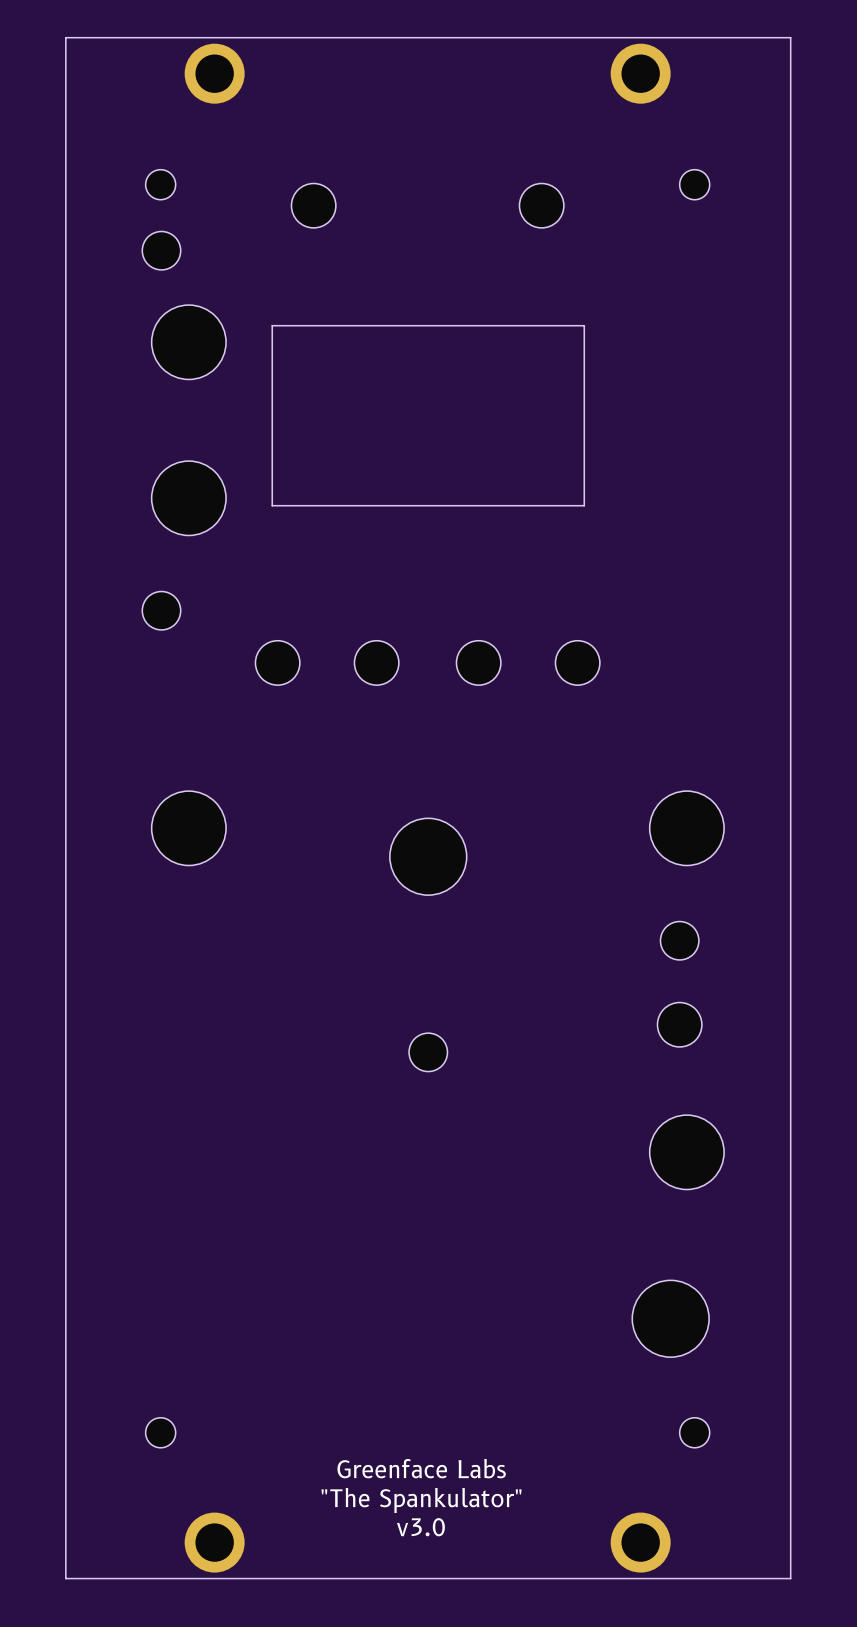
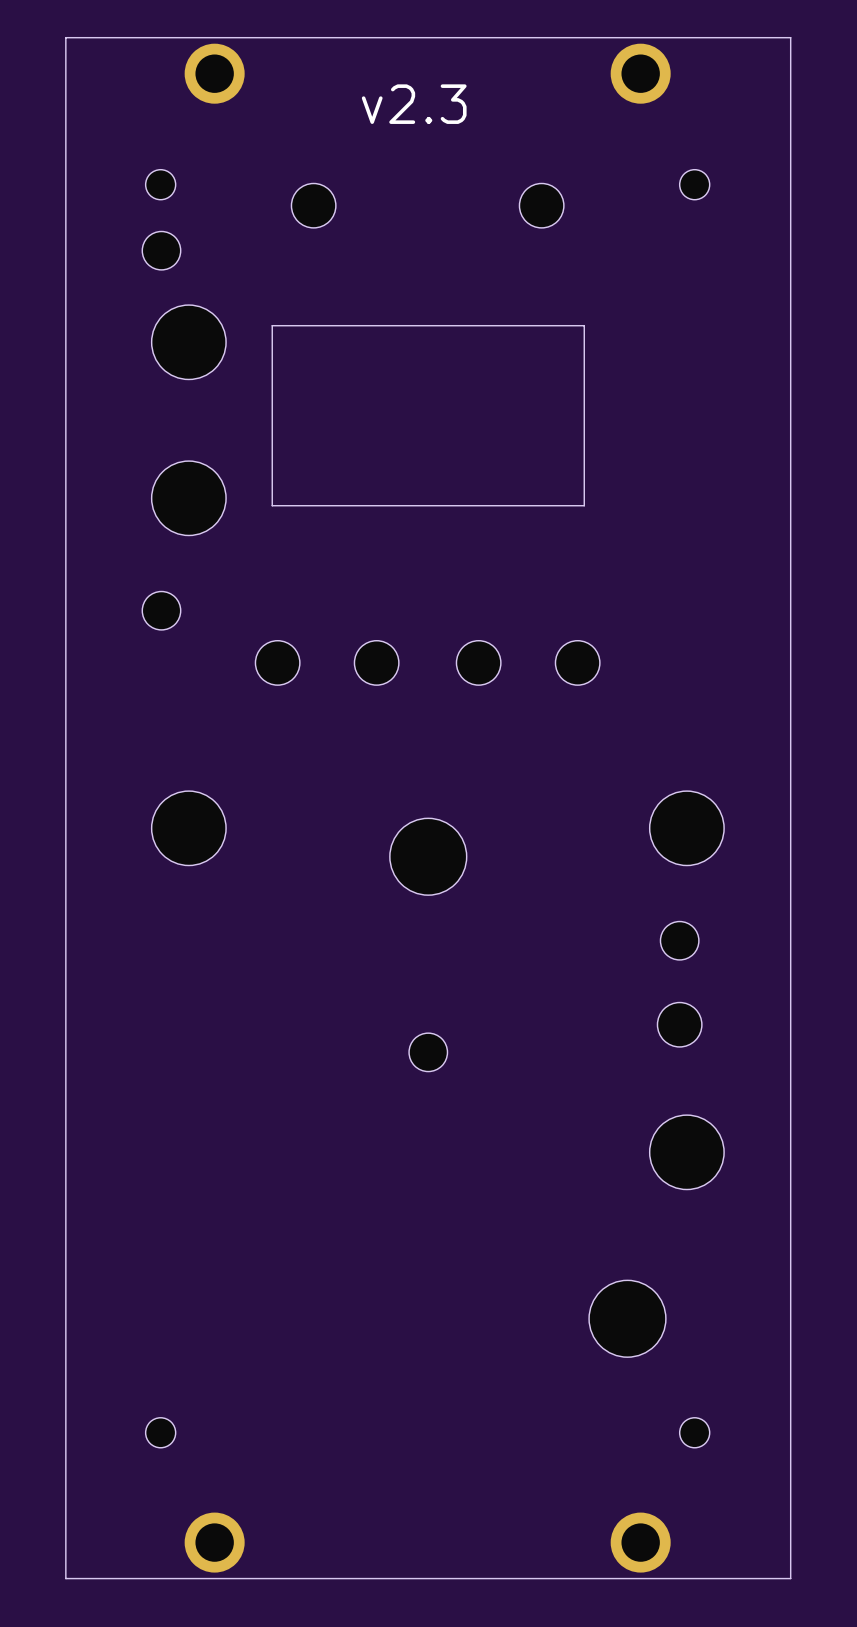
text: none -> v2.3 (414, 104)
part position: (670, 1318) -> (627, 1318)
text: Greenface Labs (421, 1468) -> none
text: "The Spankulator" (421, 1500) -> none
text: v3.0 (420, 1527) -> none

